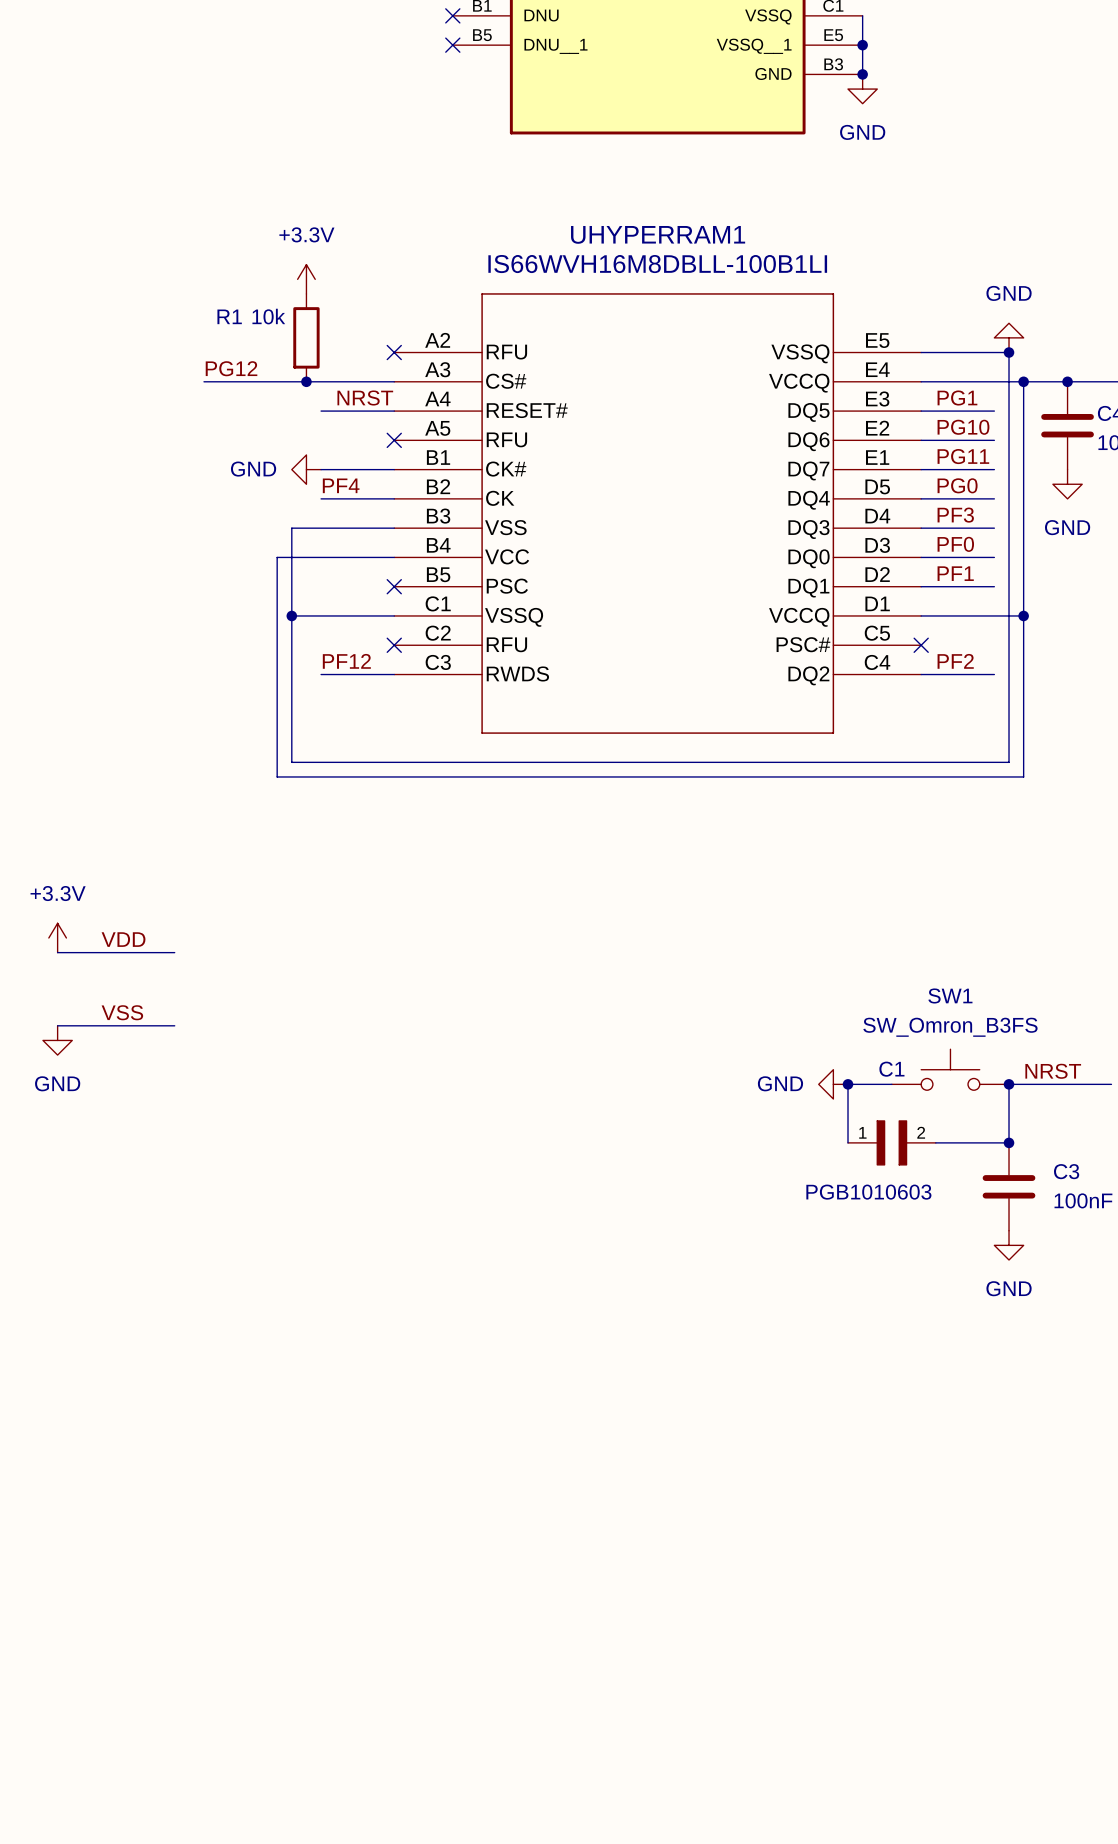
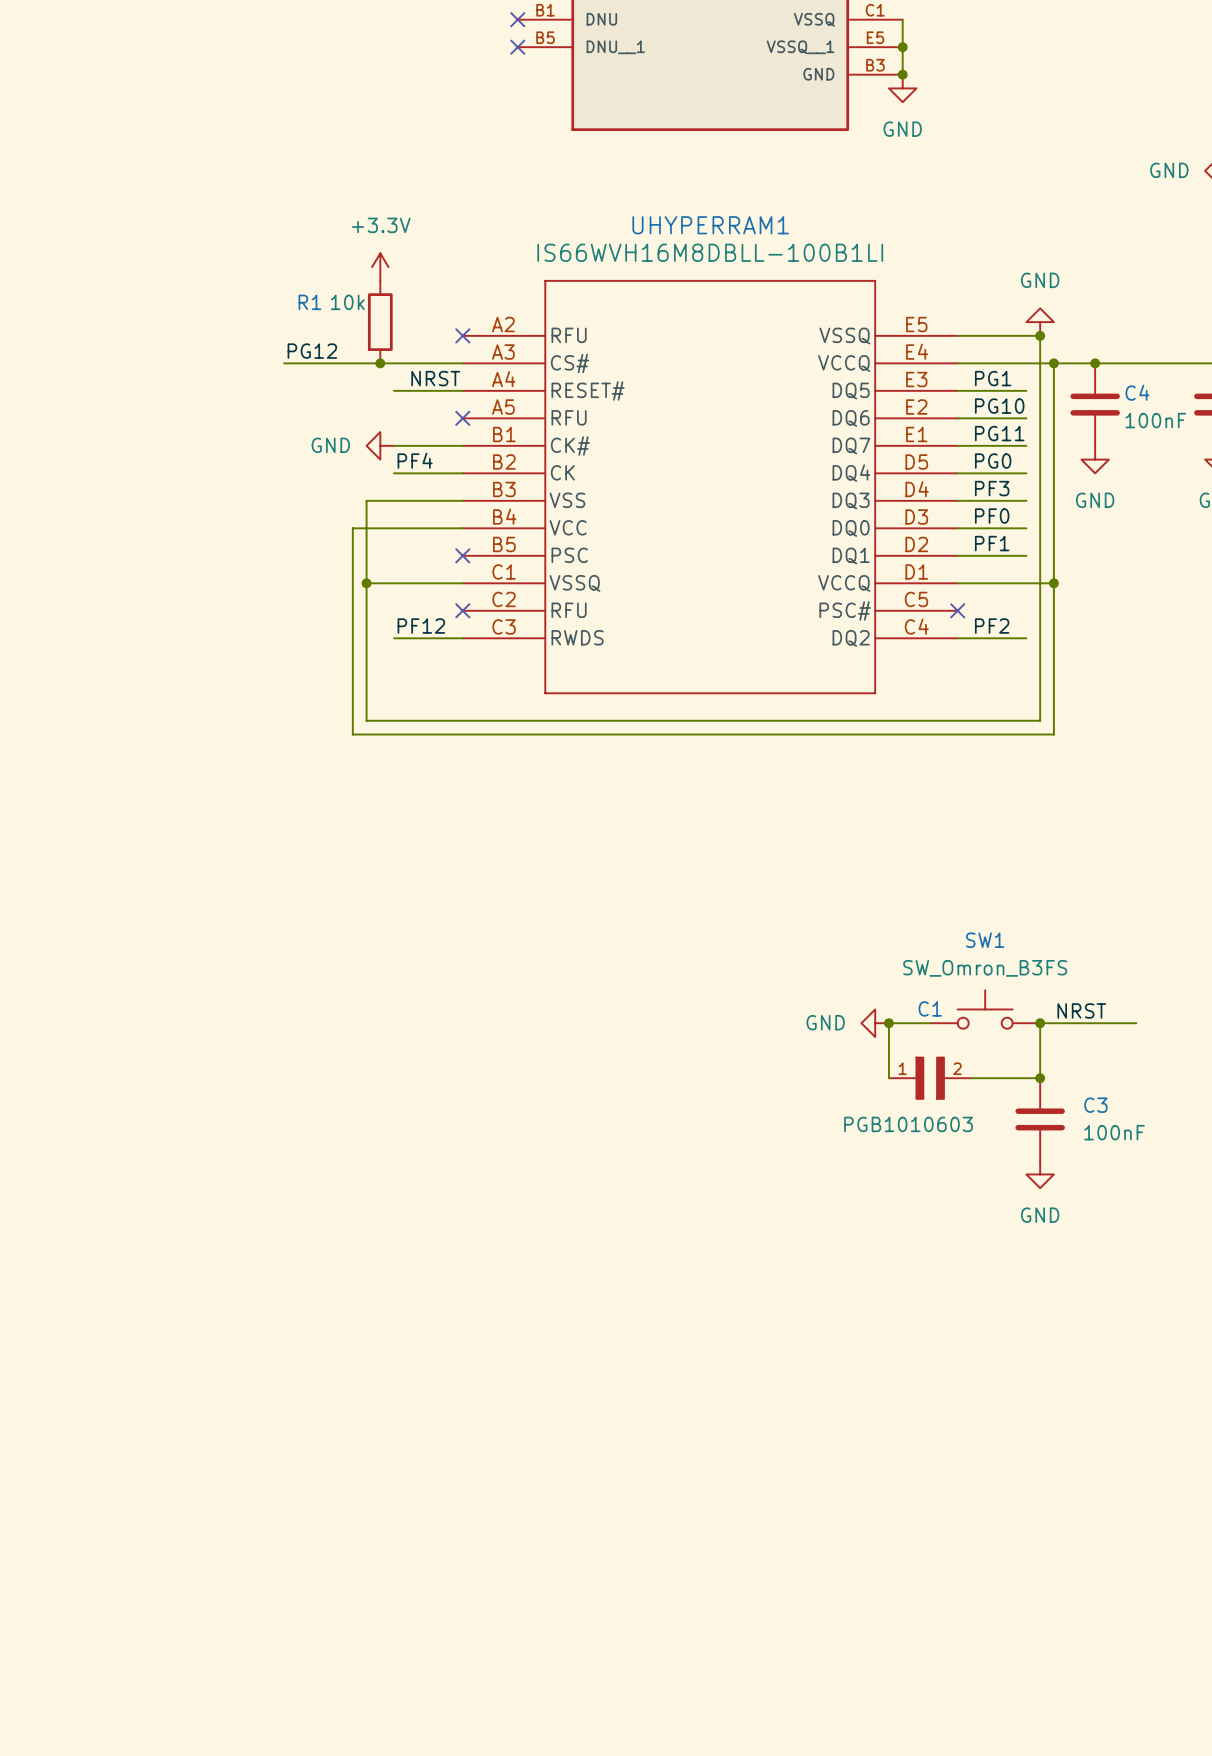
power symbol: +3.3V (57, 937) -> none
label: VDD (123, 939) -> none
wire: (57, 952) (174, 952) -> none
label: VSS (122, 1012) -> none
wire: (57, 1025) (174, 1025) -> none
power symbol: GND (57, 1040) -> none

